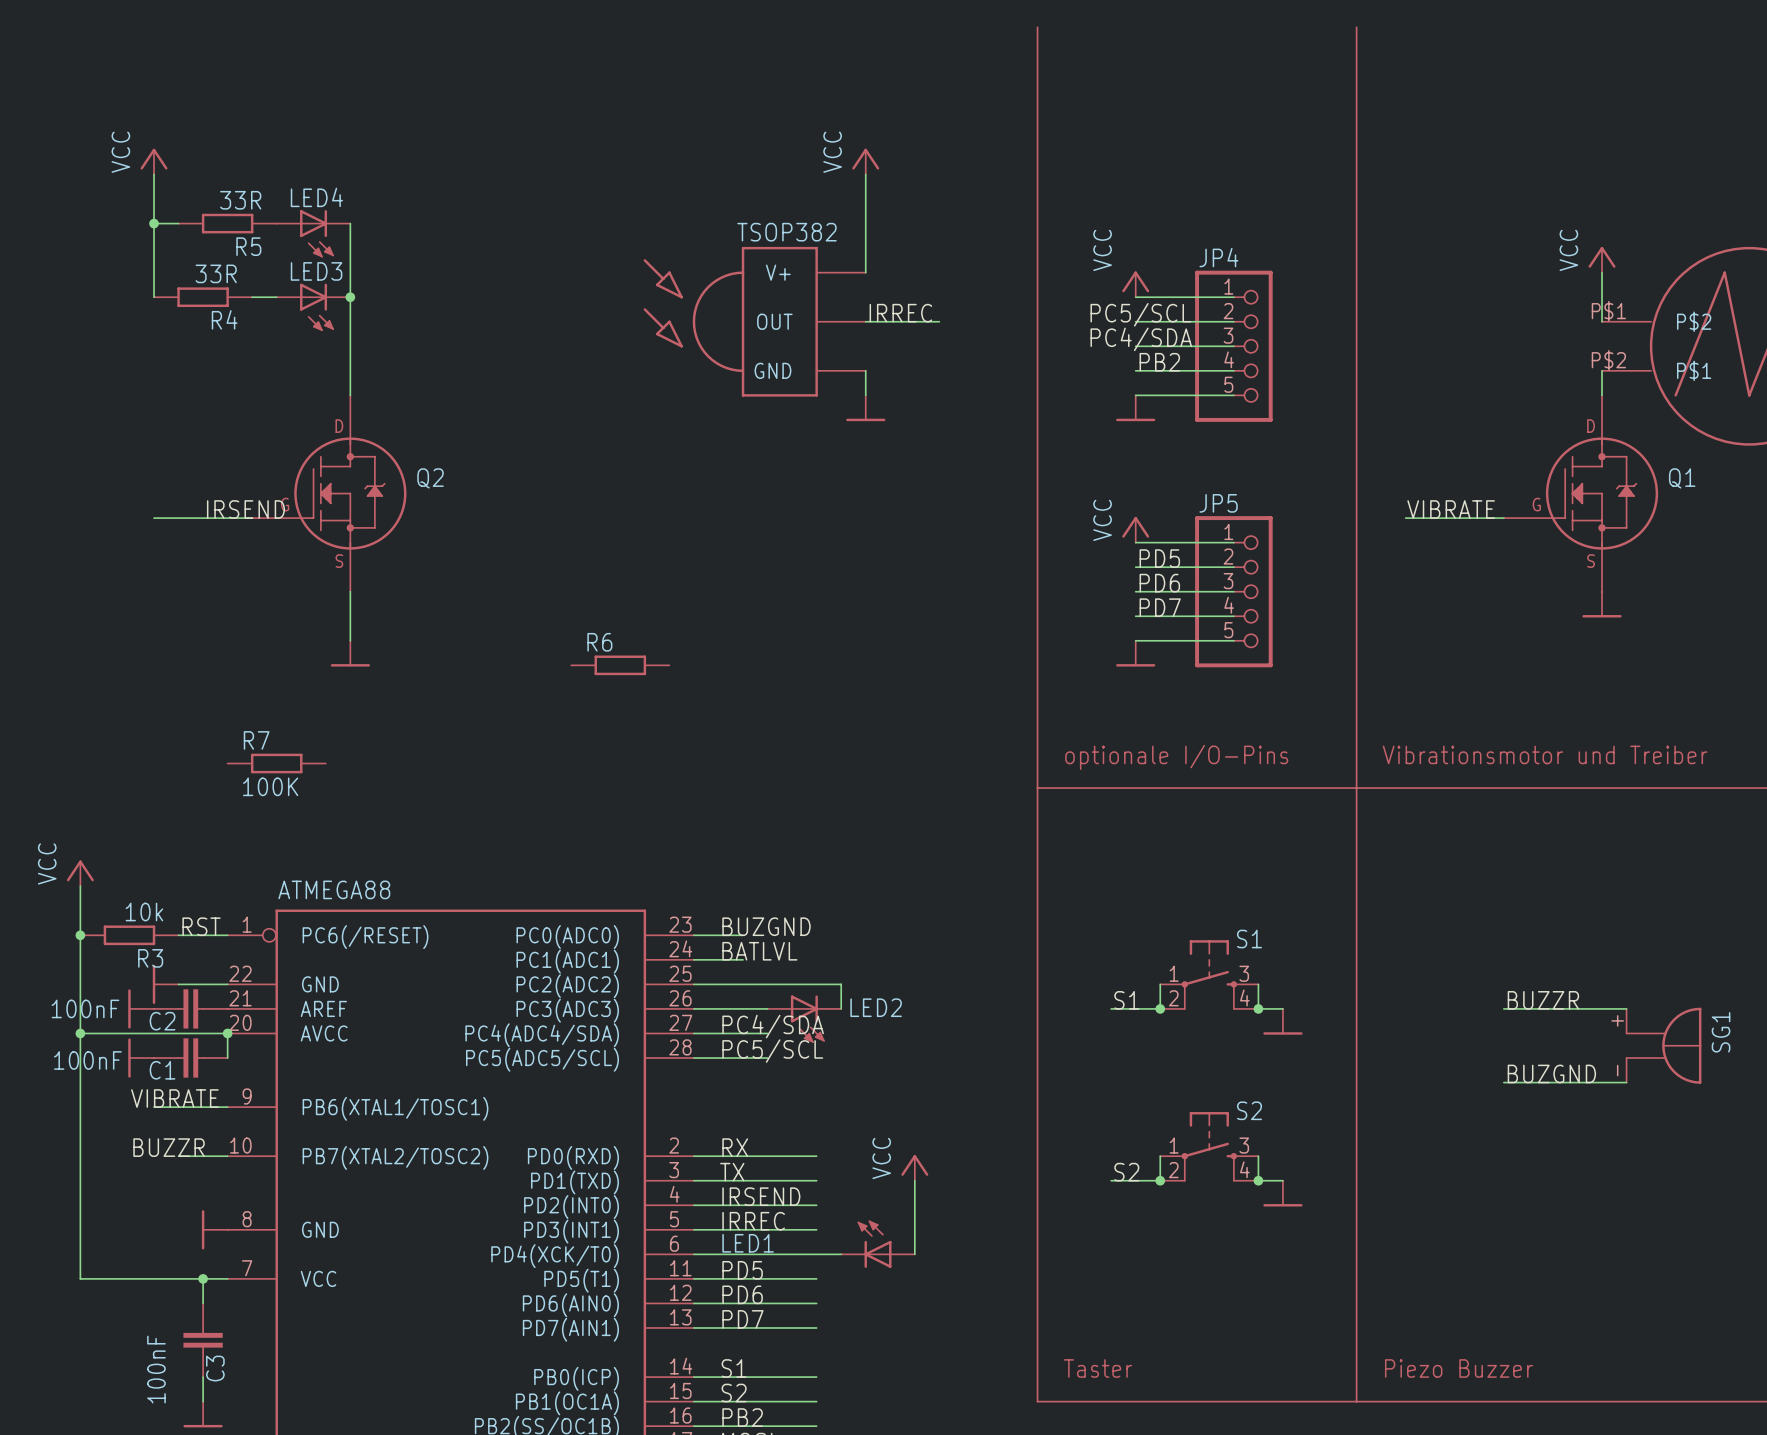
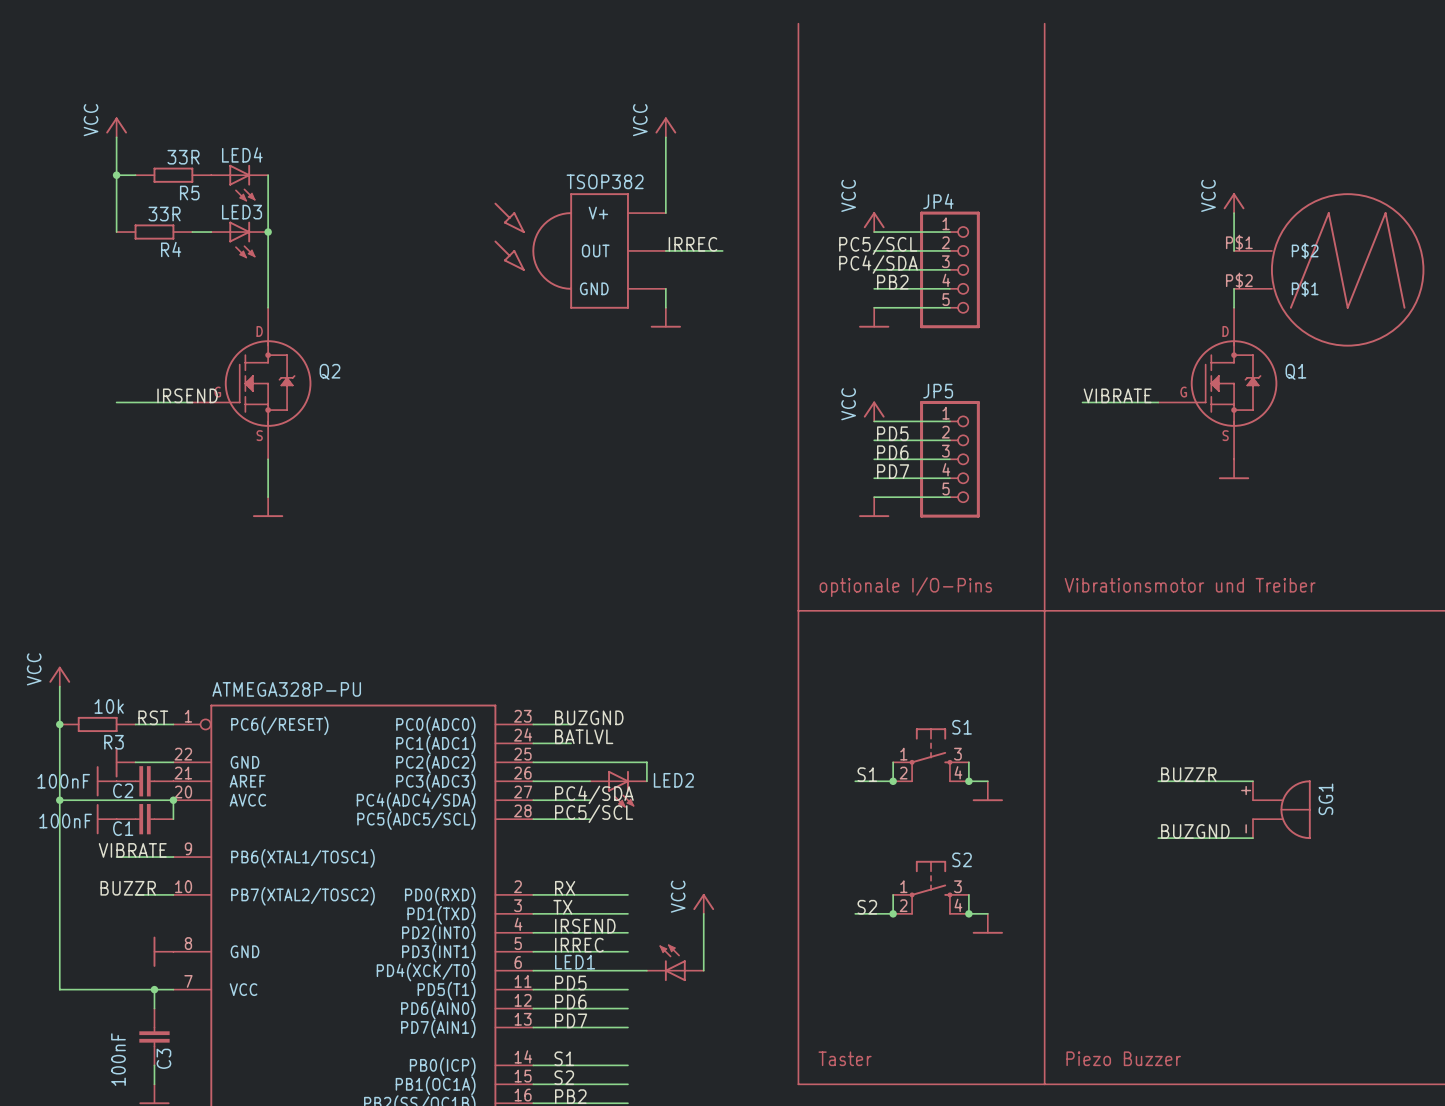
R6: (620, 665) -> none
R7: 100K (276, 763) -> none
part value: ATMEGA88 (334, 889) -> ATMEGA328P-PU (286, 689)

